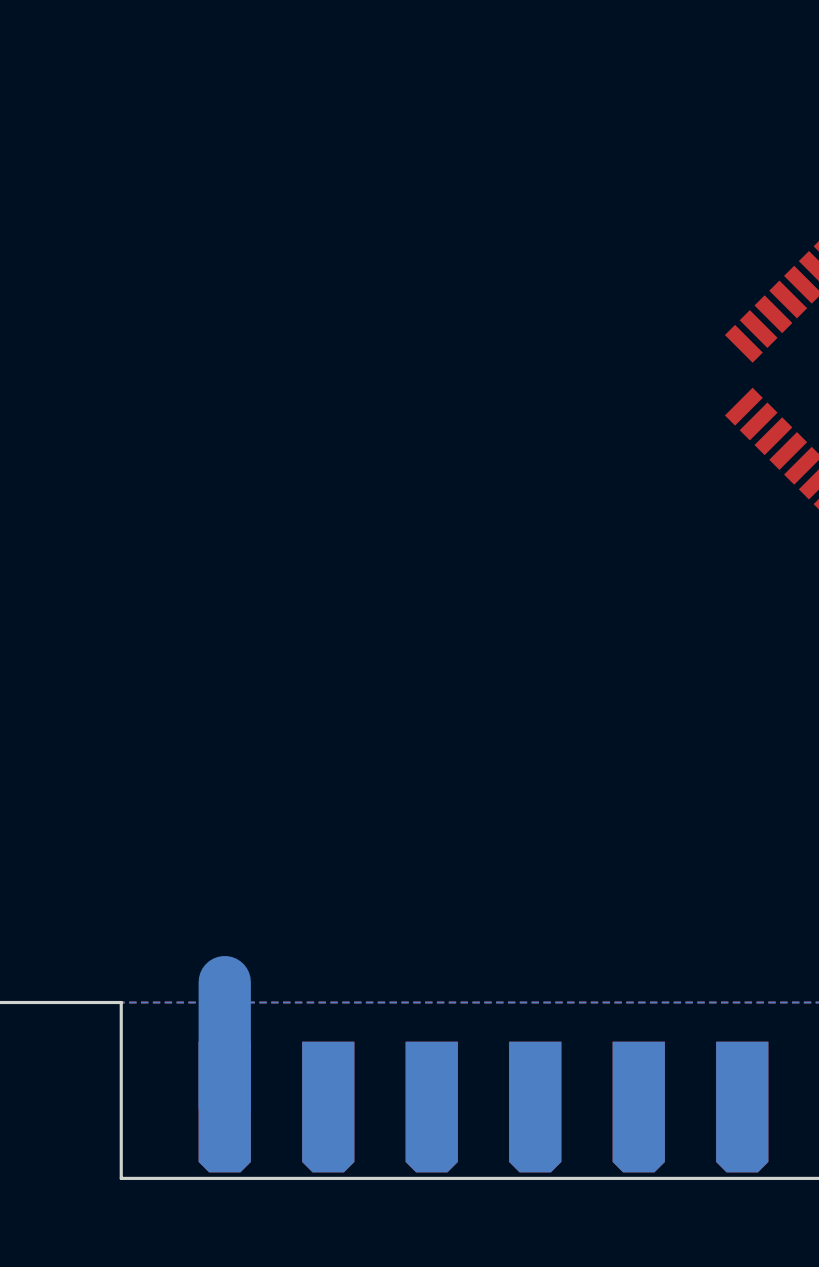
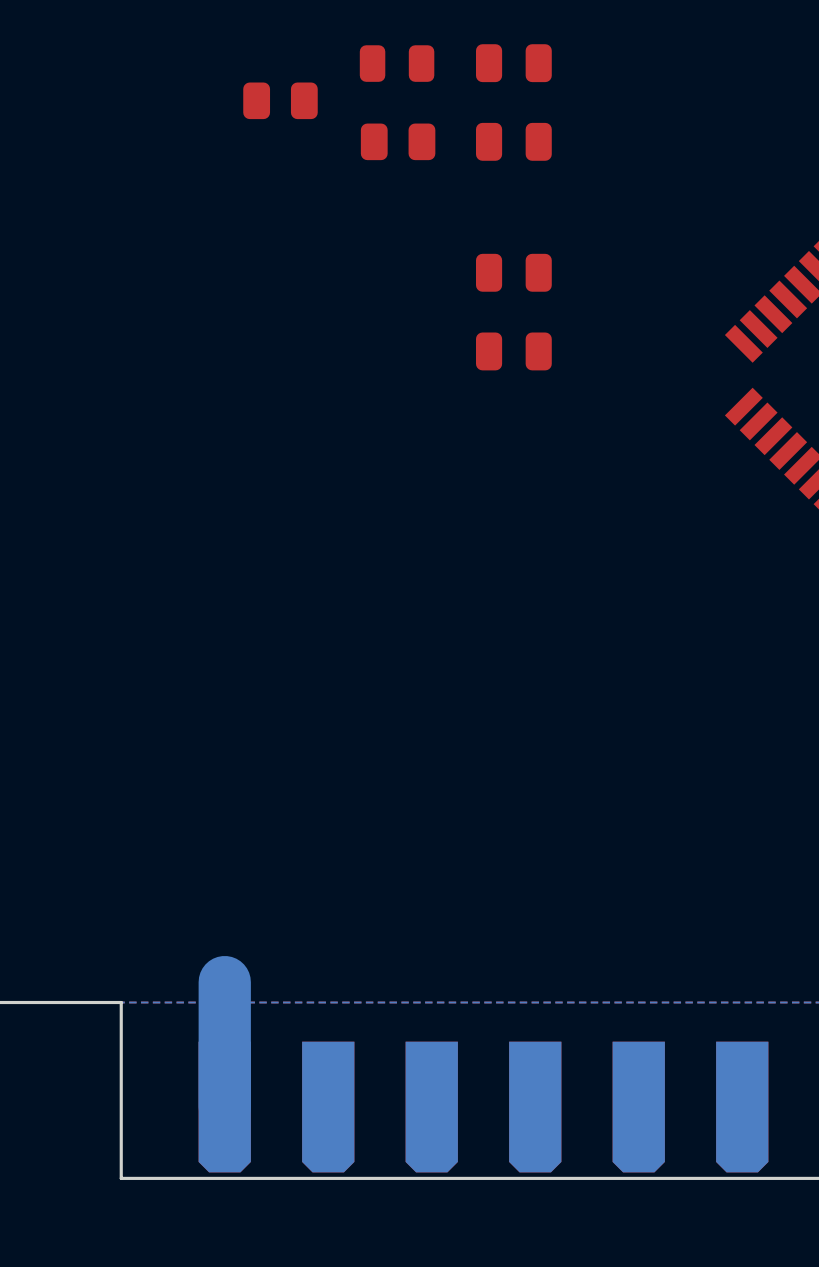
part: none -> (397, 63)
part: none -> (513, 63)
part: none -> (280, 100)
part: none -> (398, 141)
part: none -> (513, 141)
part: none -> (513, 272)
part: none -> (513, 351)

